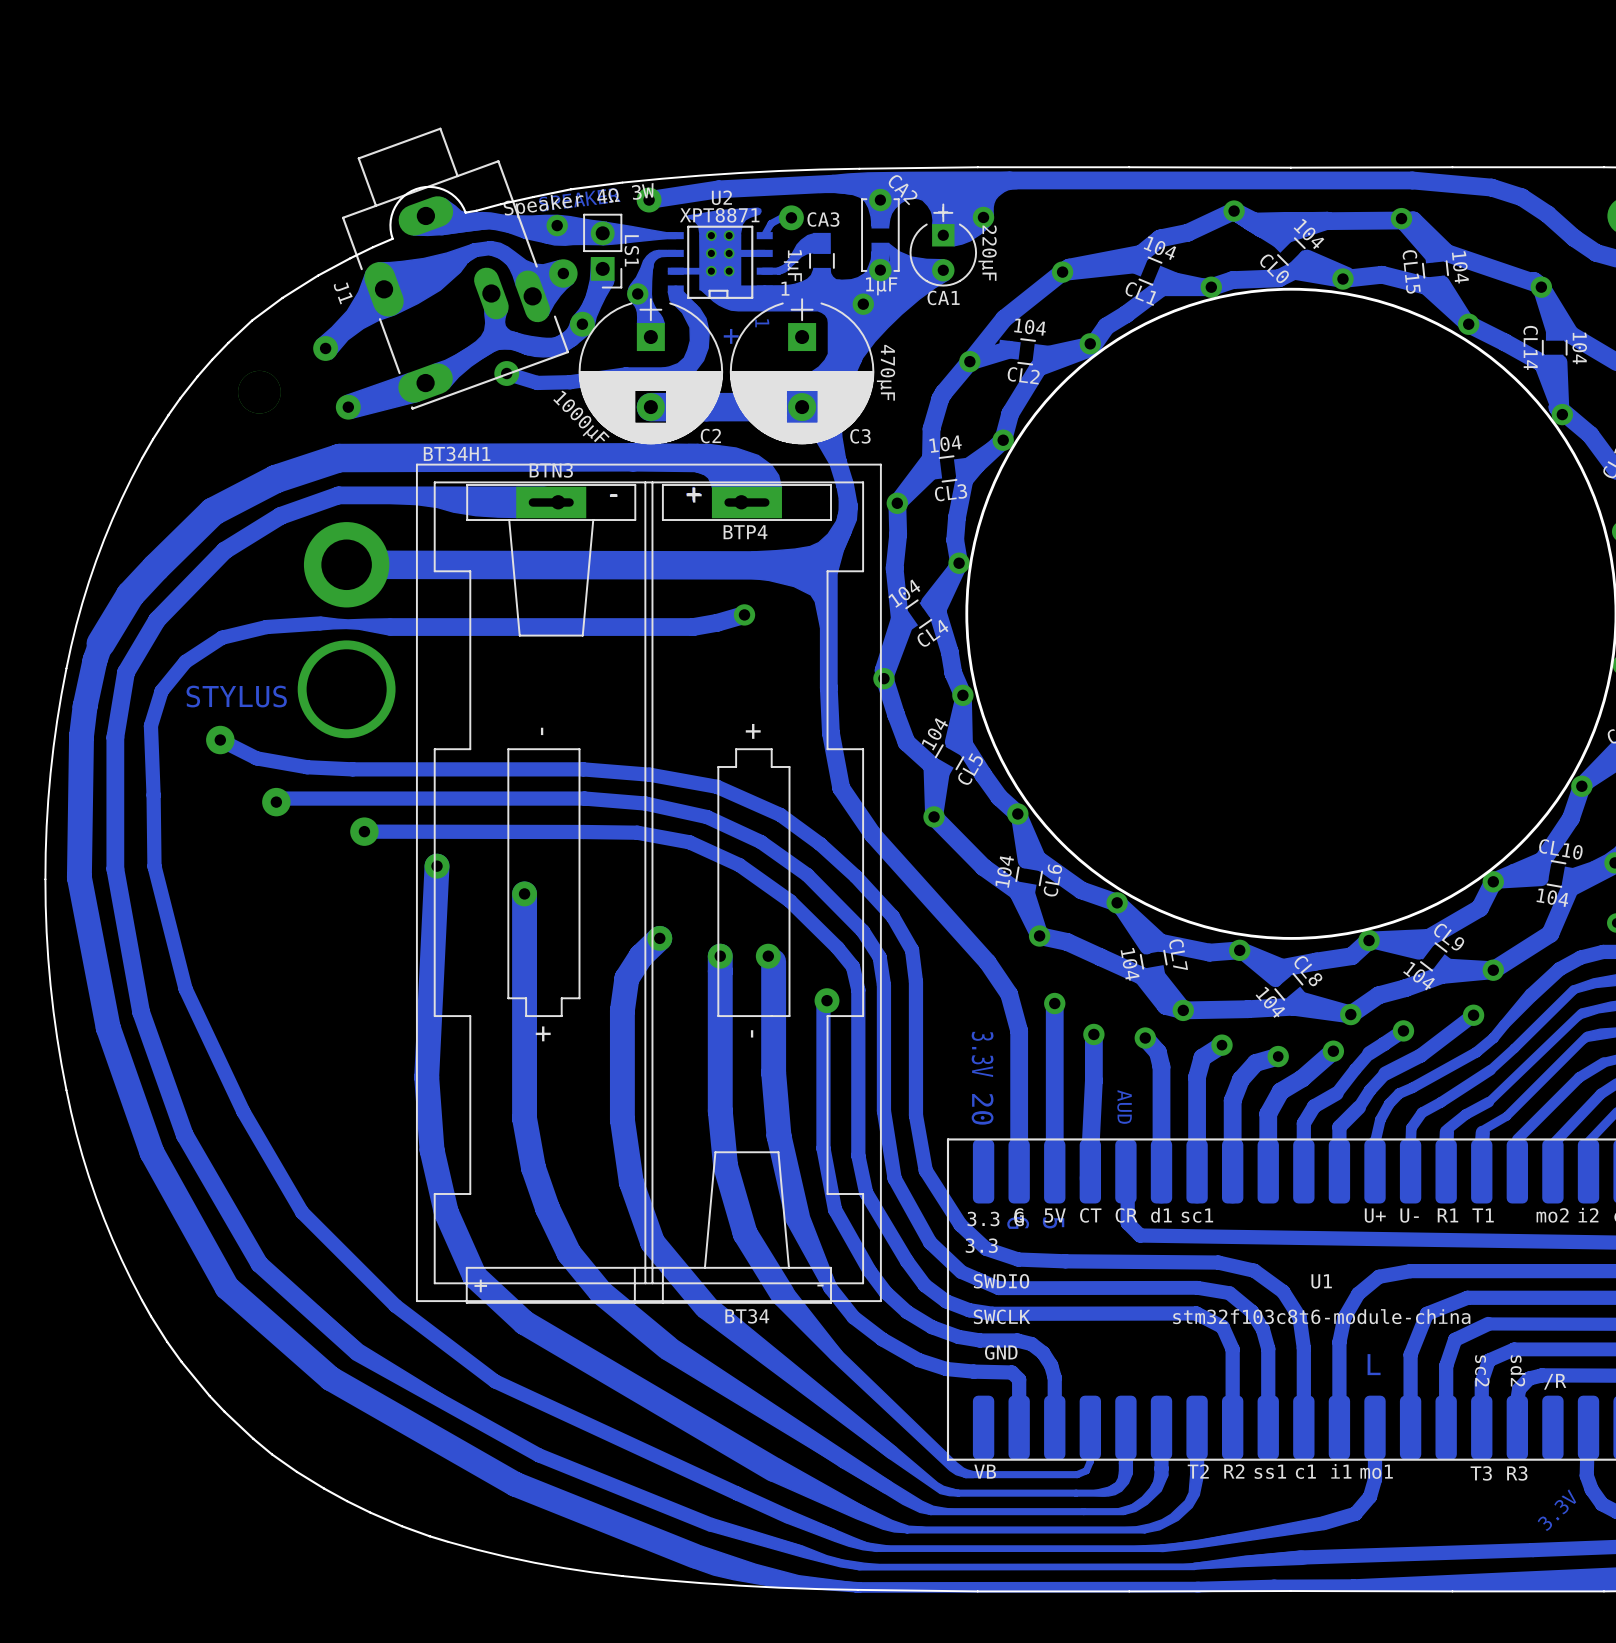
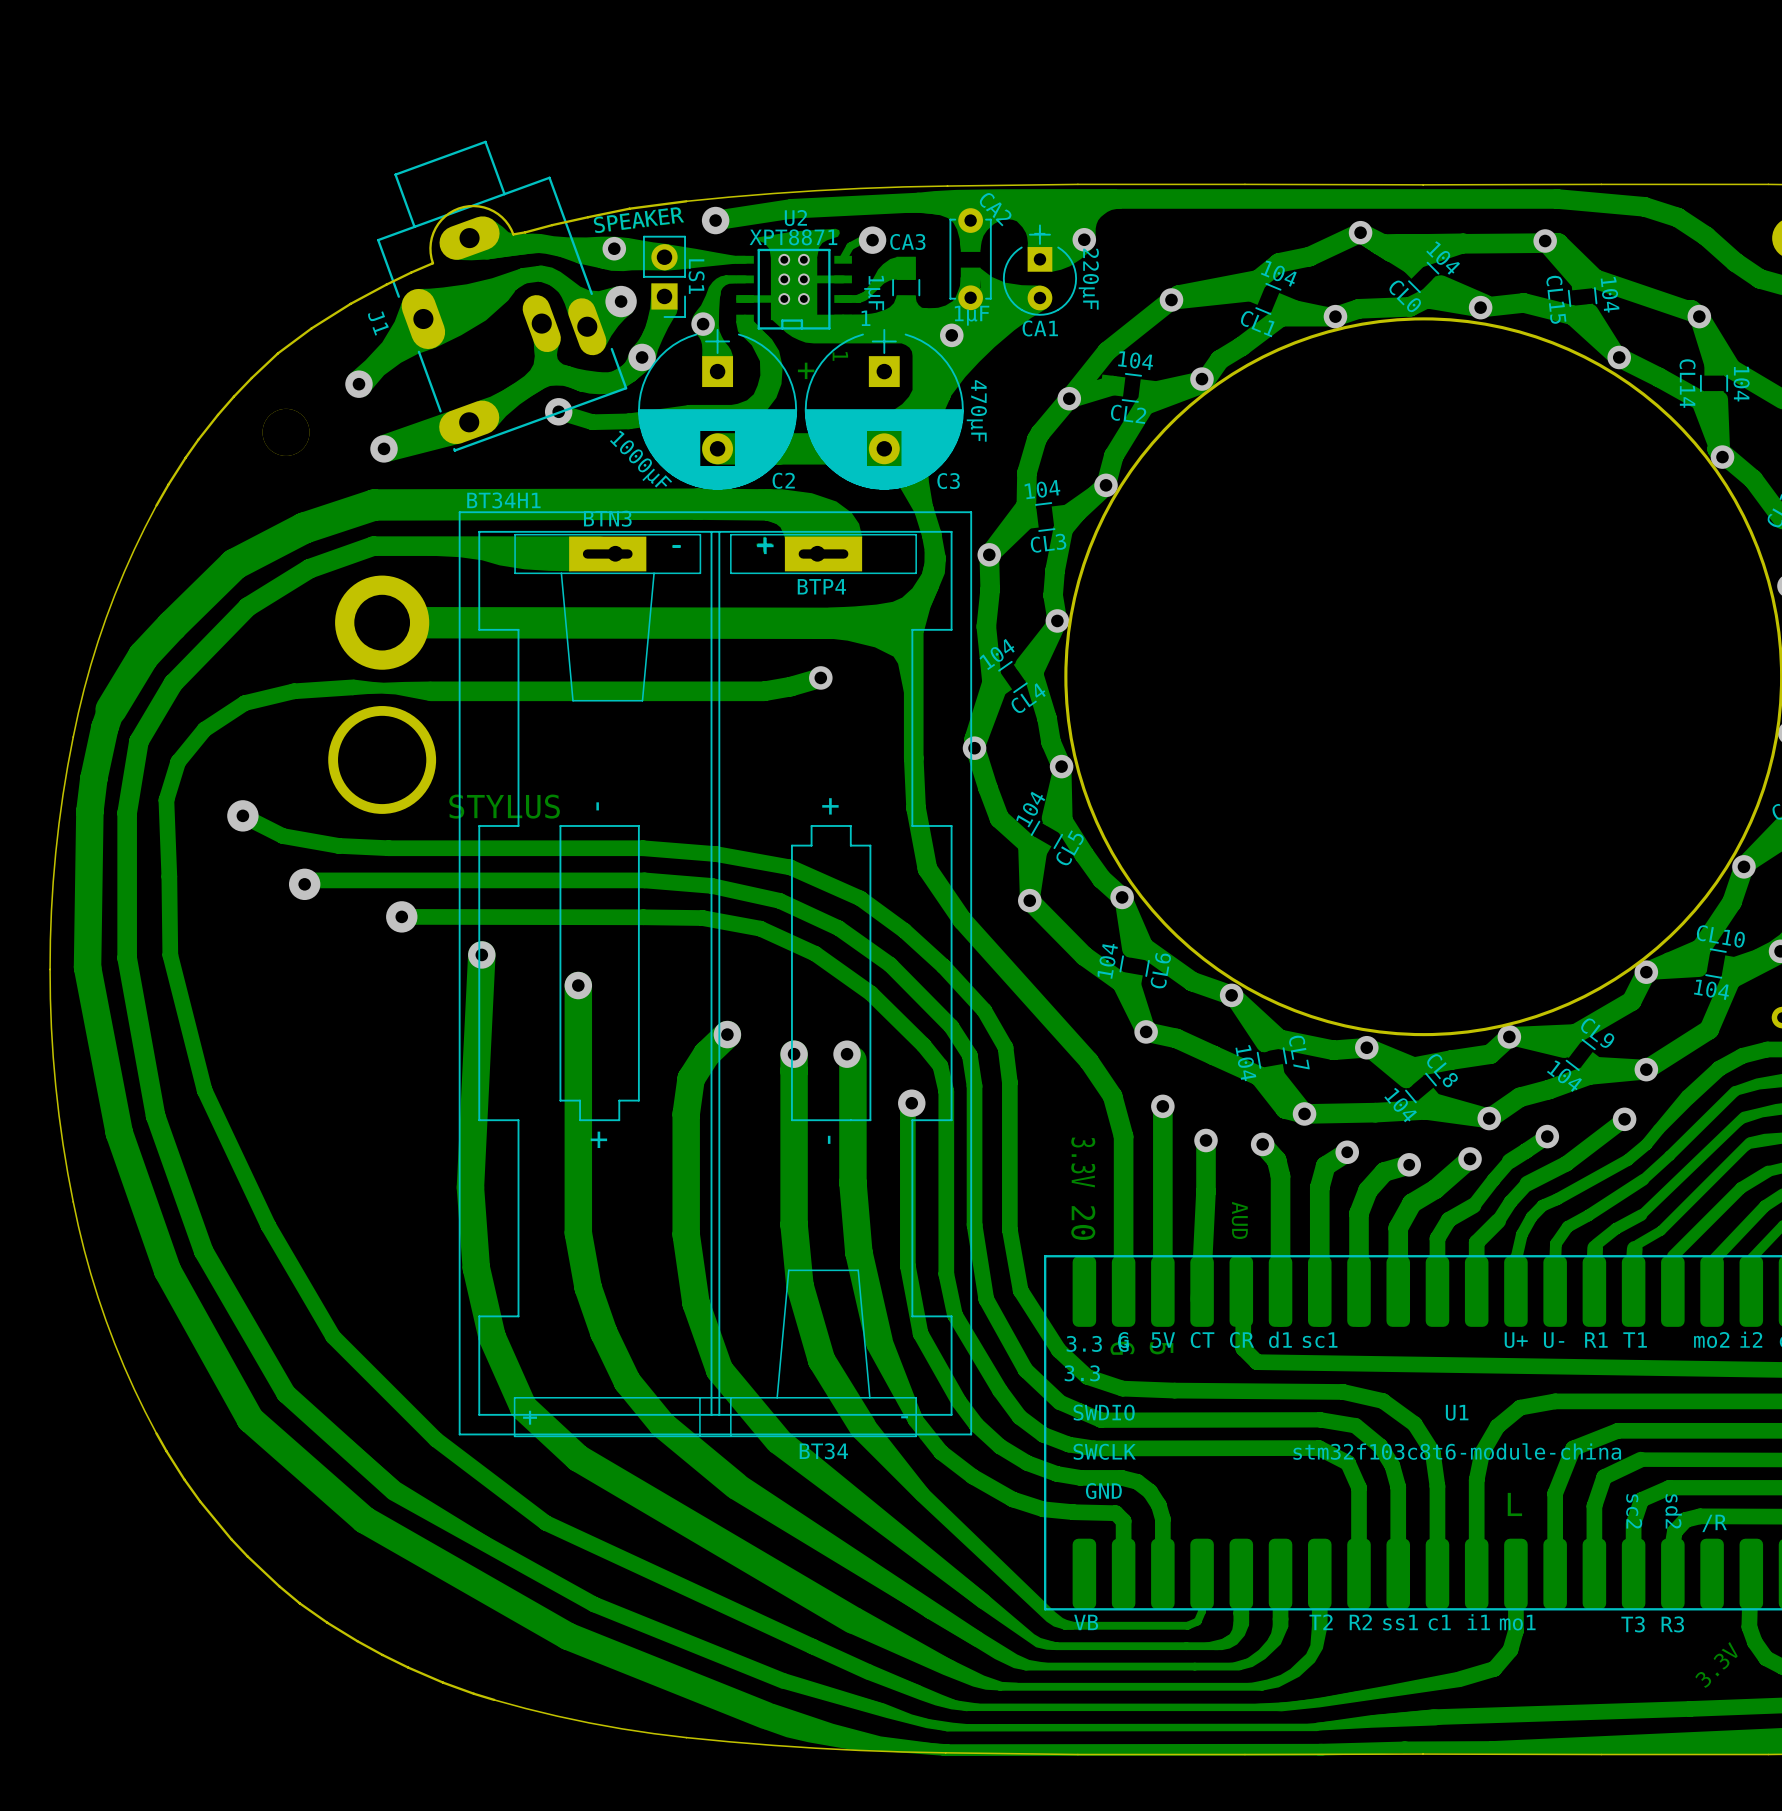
LS1 value: Speaker 4Ω 3W (578, 200) -> SPEAKER (638, 220)
text position: STYLUS (236, 696) -> STYLUS (504, 806)

